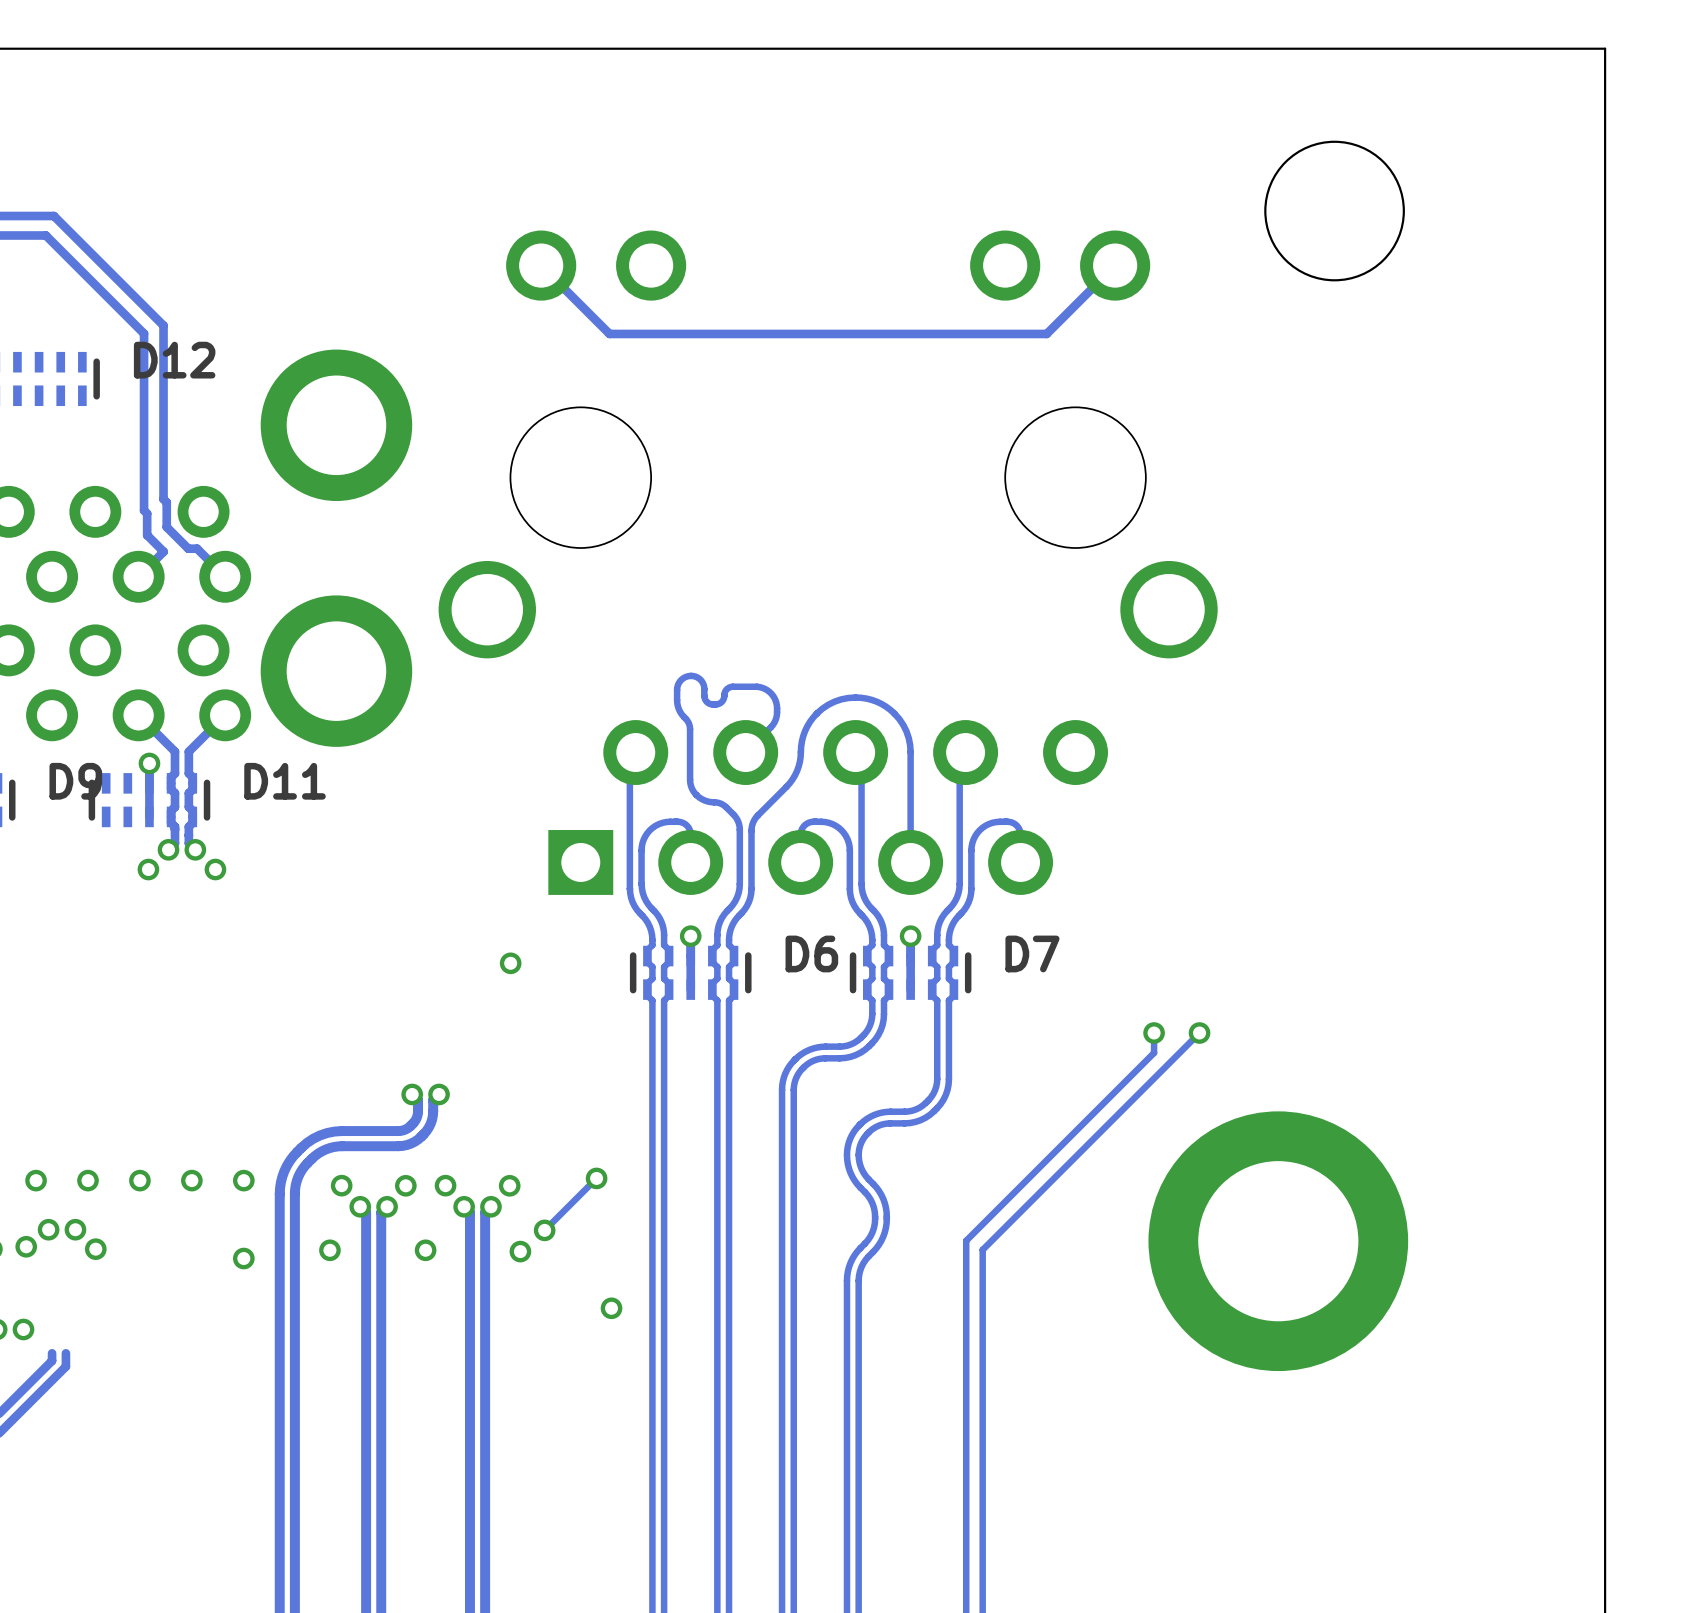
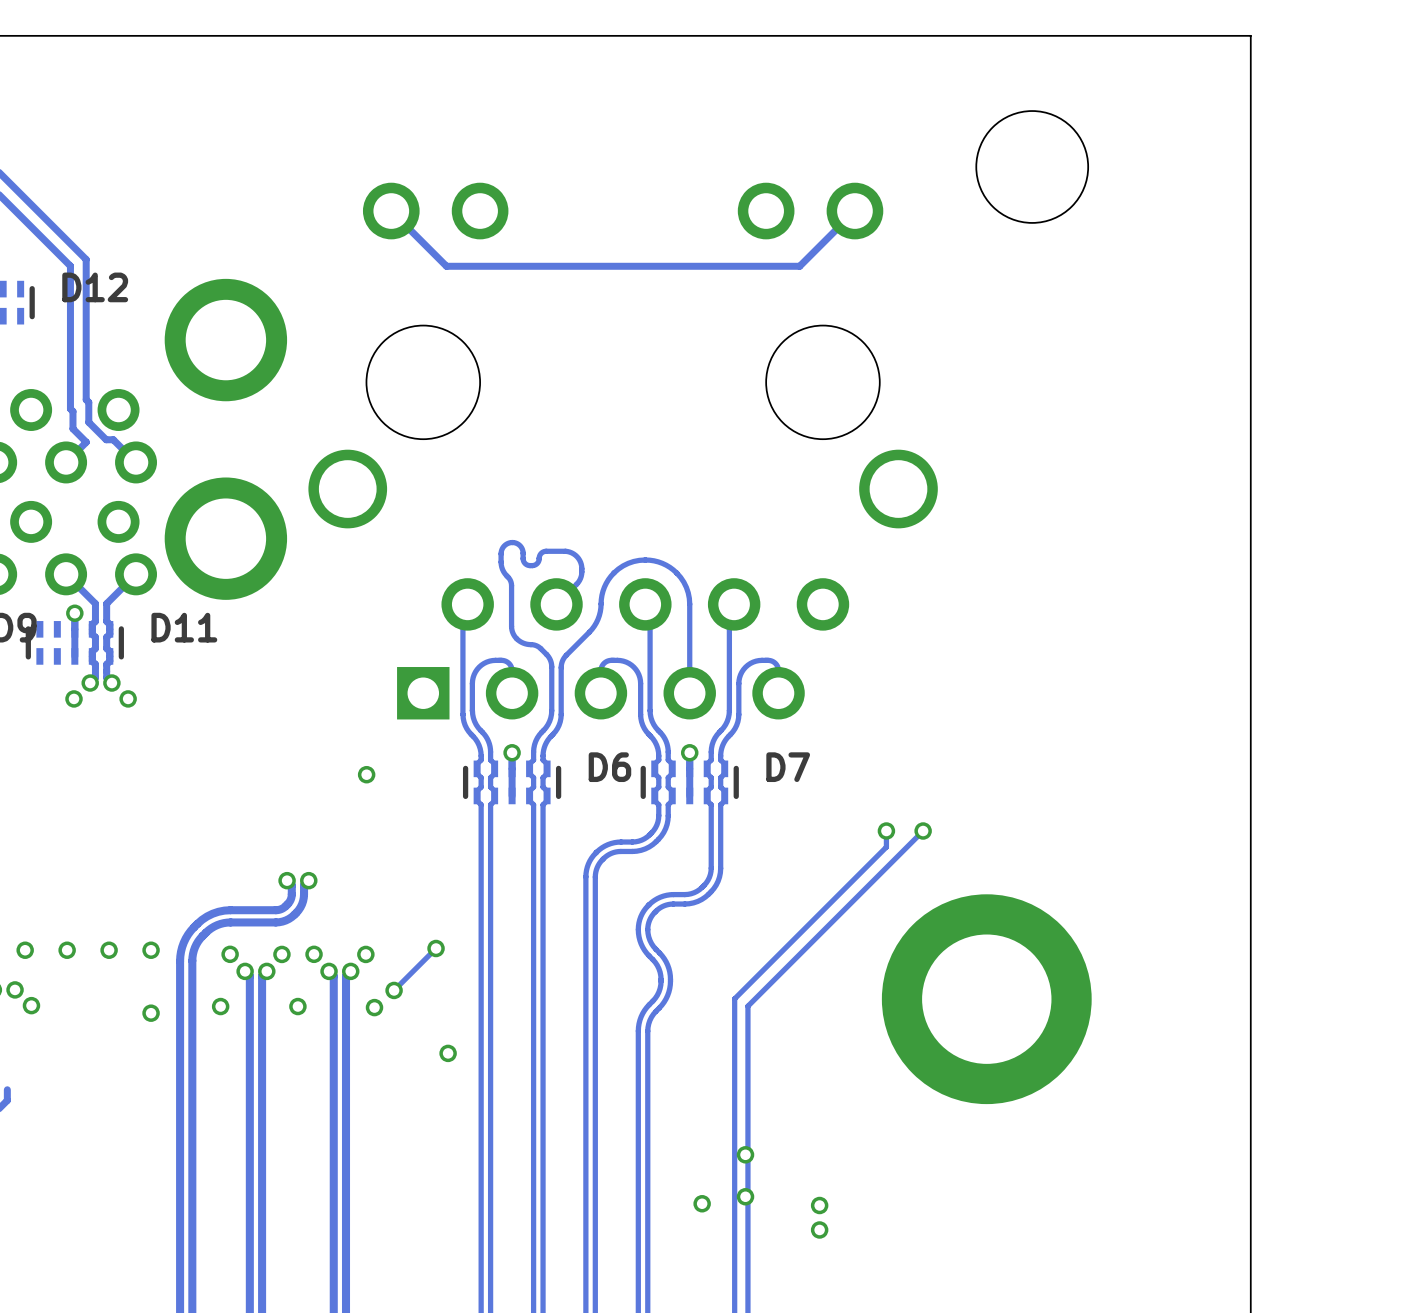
via: none -> (745, 1154)
via: none -> (745, 1196)
via: none -> (702, 1203)
via: none -> (819, 1205)
via: none -> (819, 1229)

